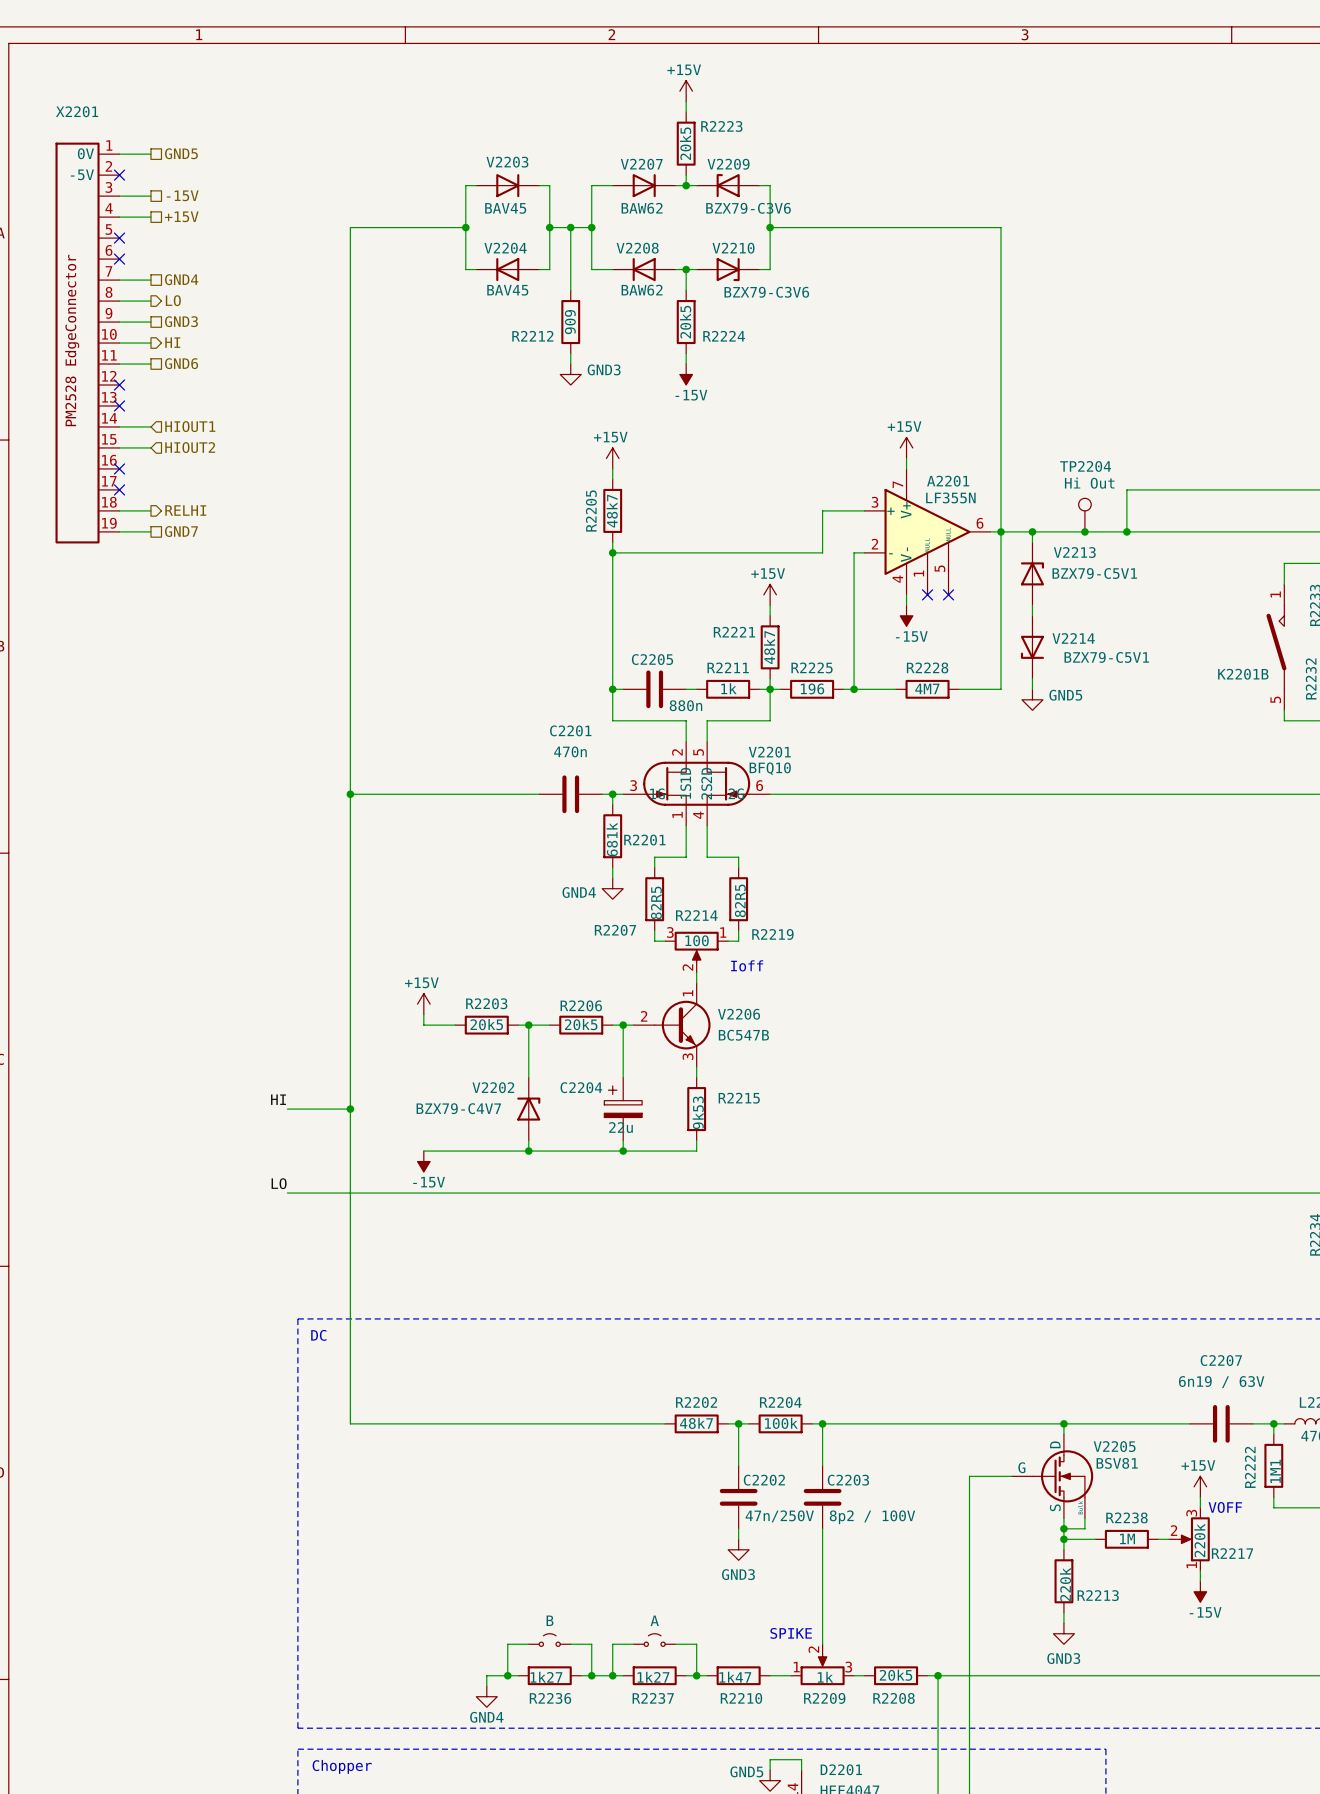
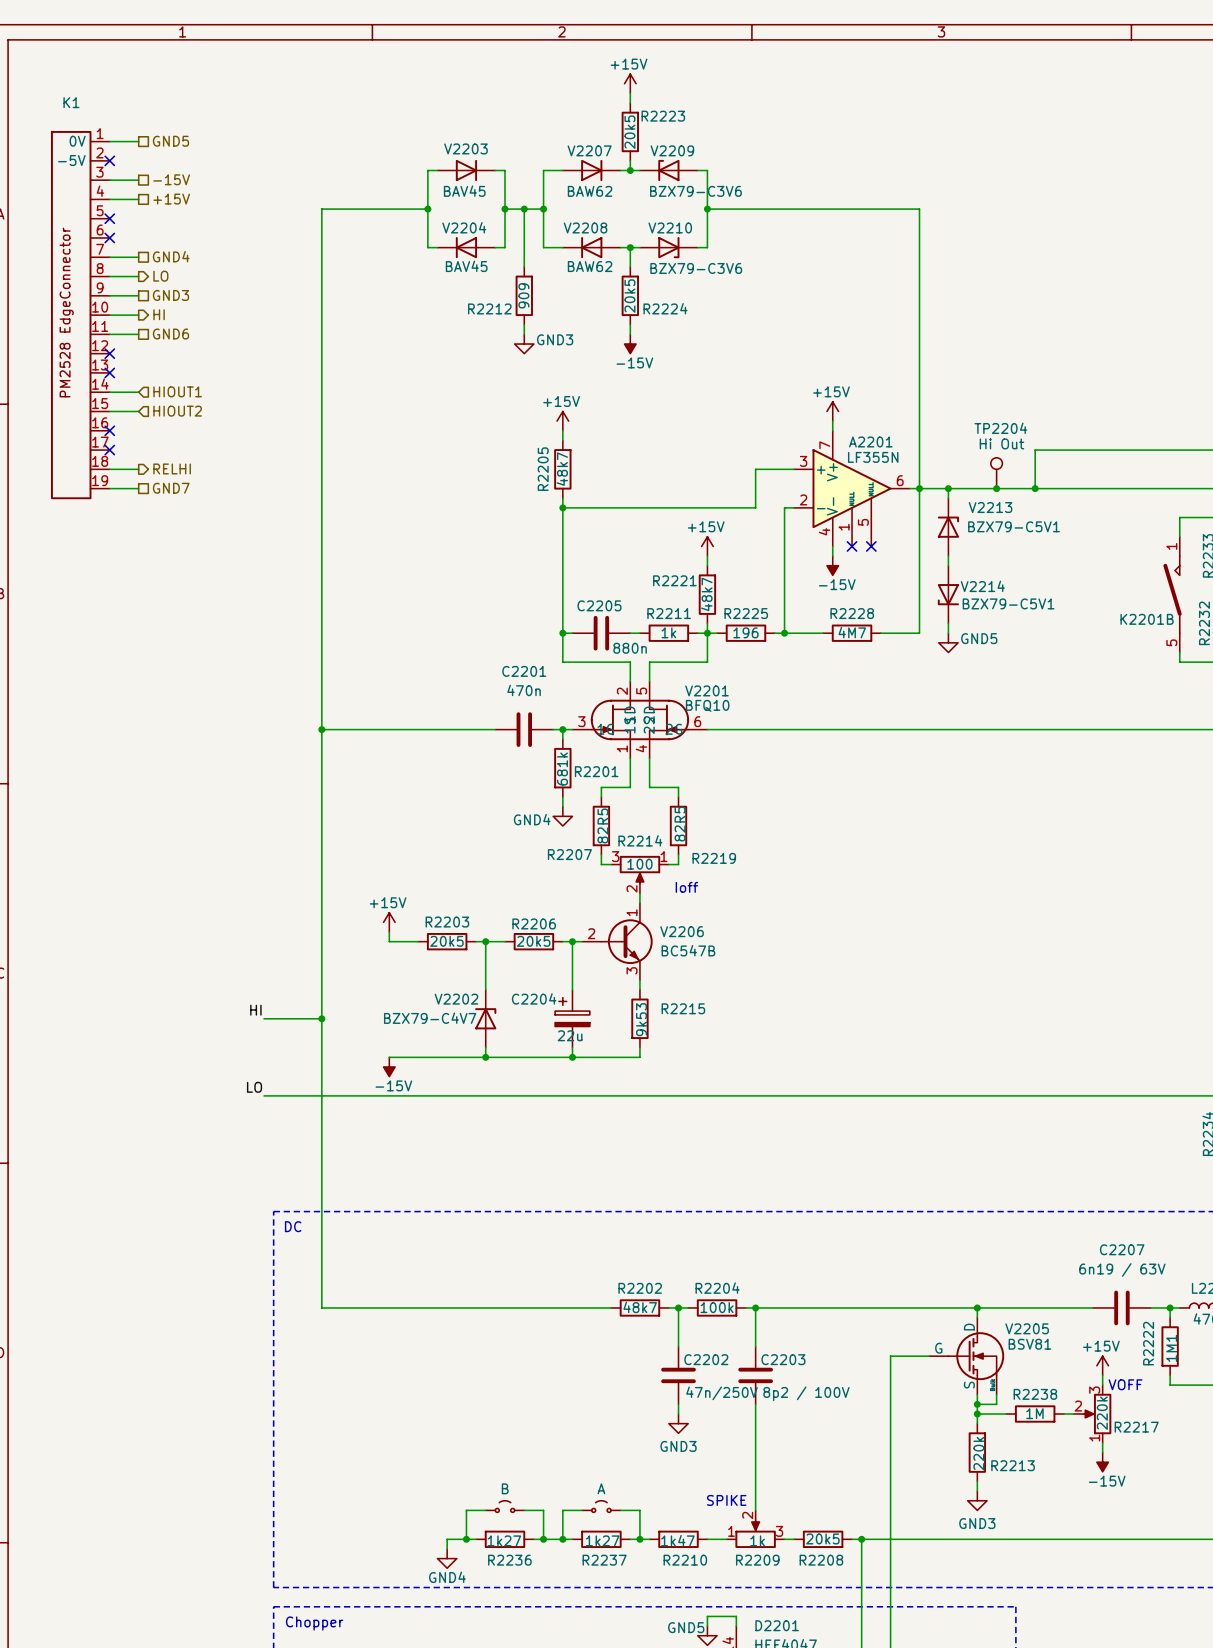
X2201 name: X2201 (77, 111) -> K1 (71, 102)

